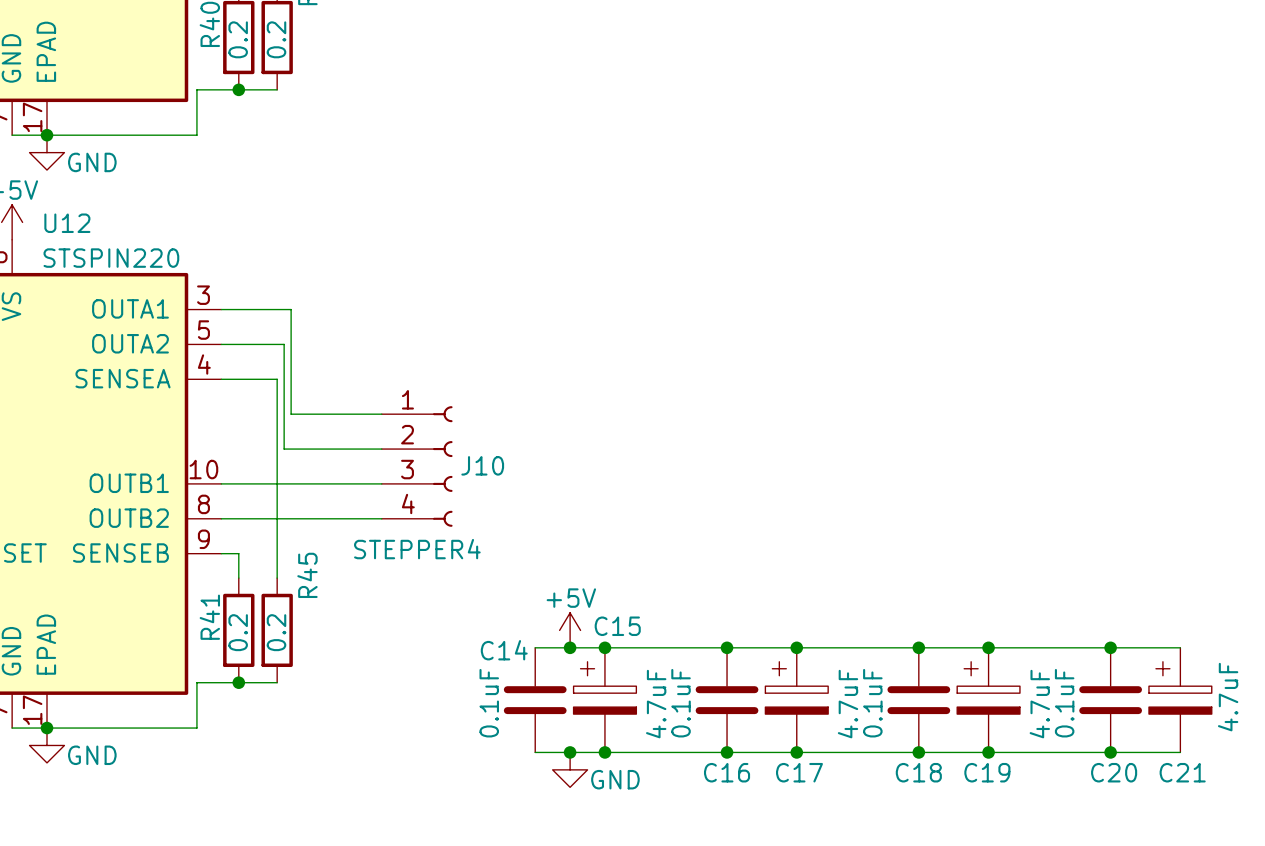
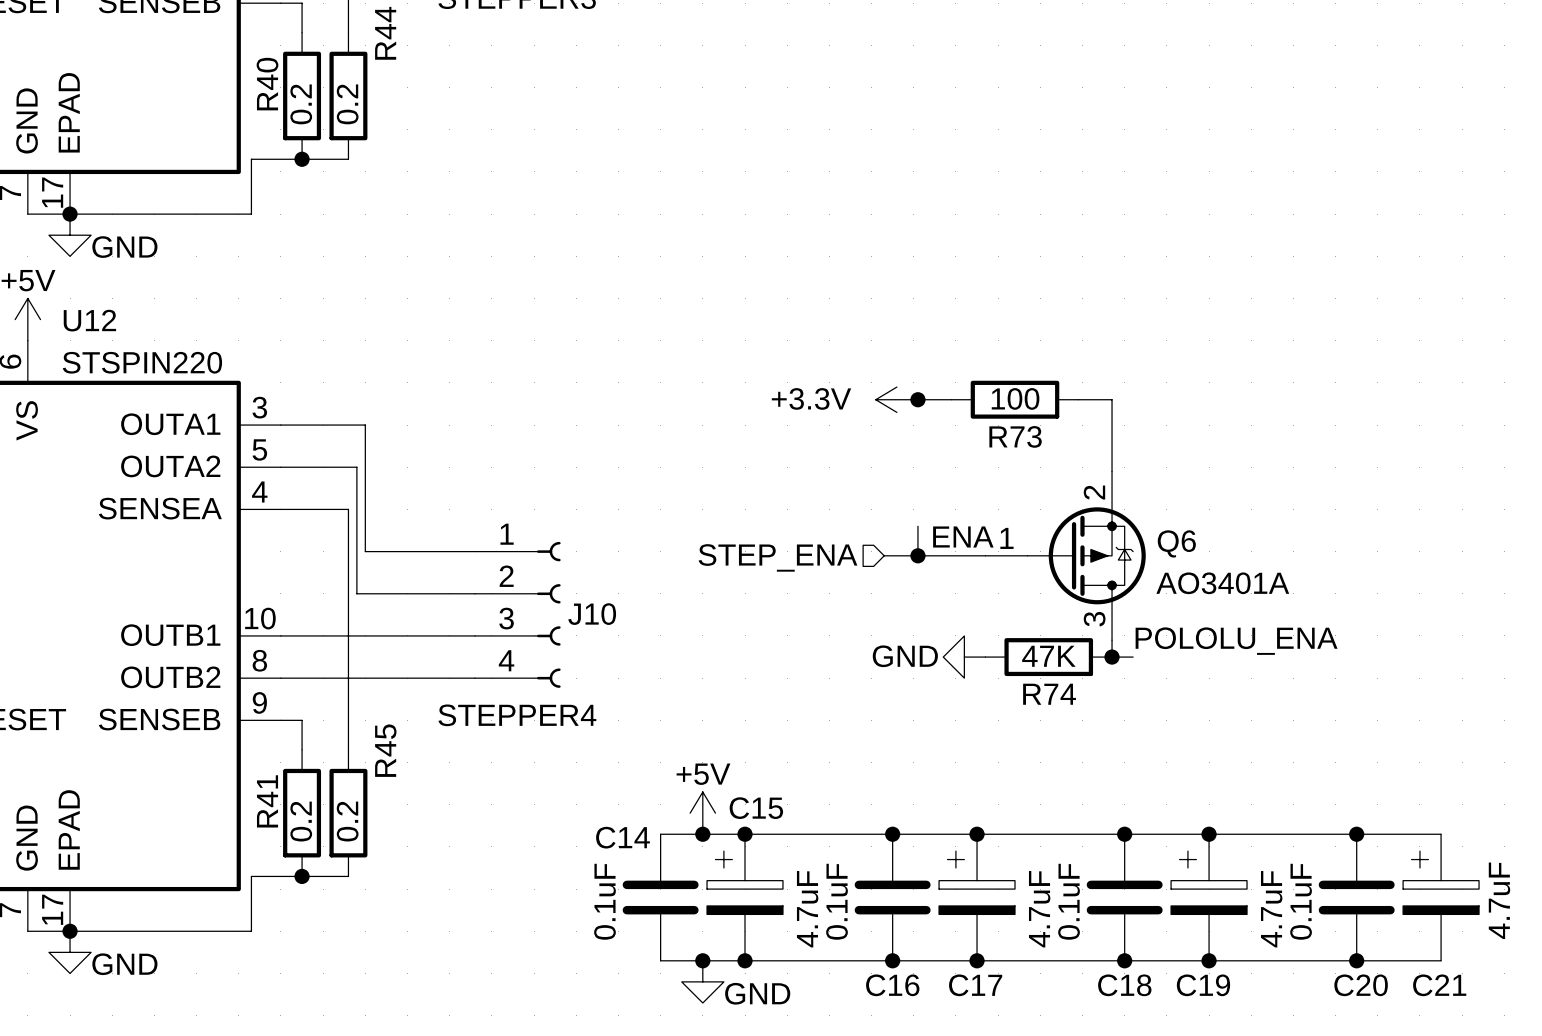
power symbol: none -> +3.3V (896, 399)
wire: none -> (917, 399) (951, 399)
junction: none -> (917, 399)
R73: none -> 100 (1014, 399)
wire: none -> (1078, 399) (1112, 399) (1112, 471)
wire: none -> (917, 526) (917, 555)
label: none -> ENA (963, 537)
hierarchical label: none -> STEP_ENA (778, 557)
wire: none -> (884, 555) (985, 555)
junction: none -> (917, 555)
Q6: none -> AO3401A (1065, 555)
label: none -> POLOLU_ENA (1236, 641)
wire: none -> (1112, 640) (1112, 657) (1133, 657)
power symbol: none -> GND (964, 657)
R74: none -> 47K (1048, 657)
junction: none -> (1112, 657)

